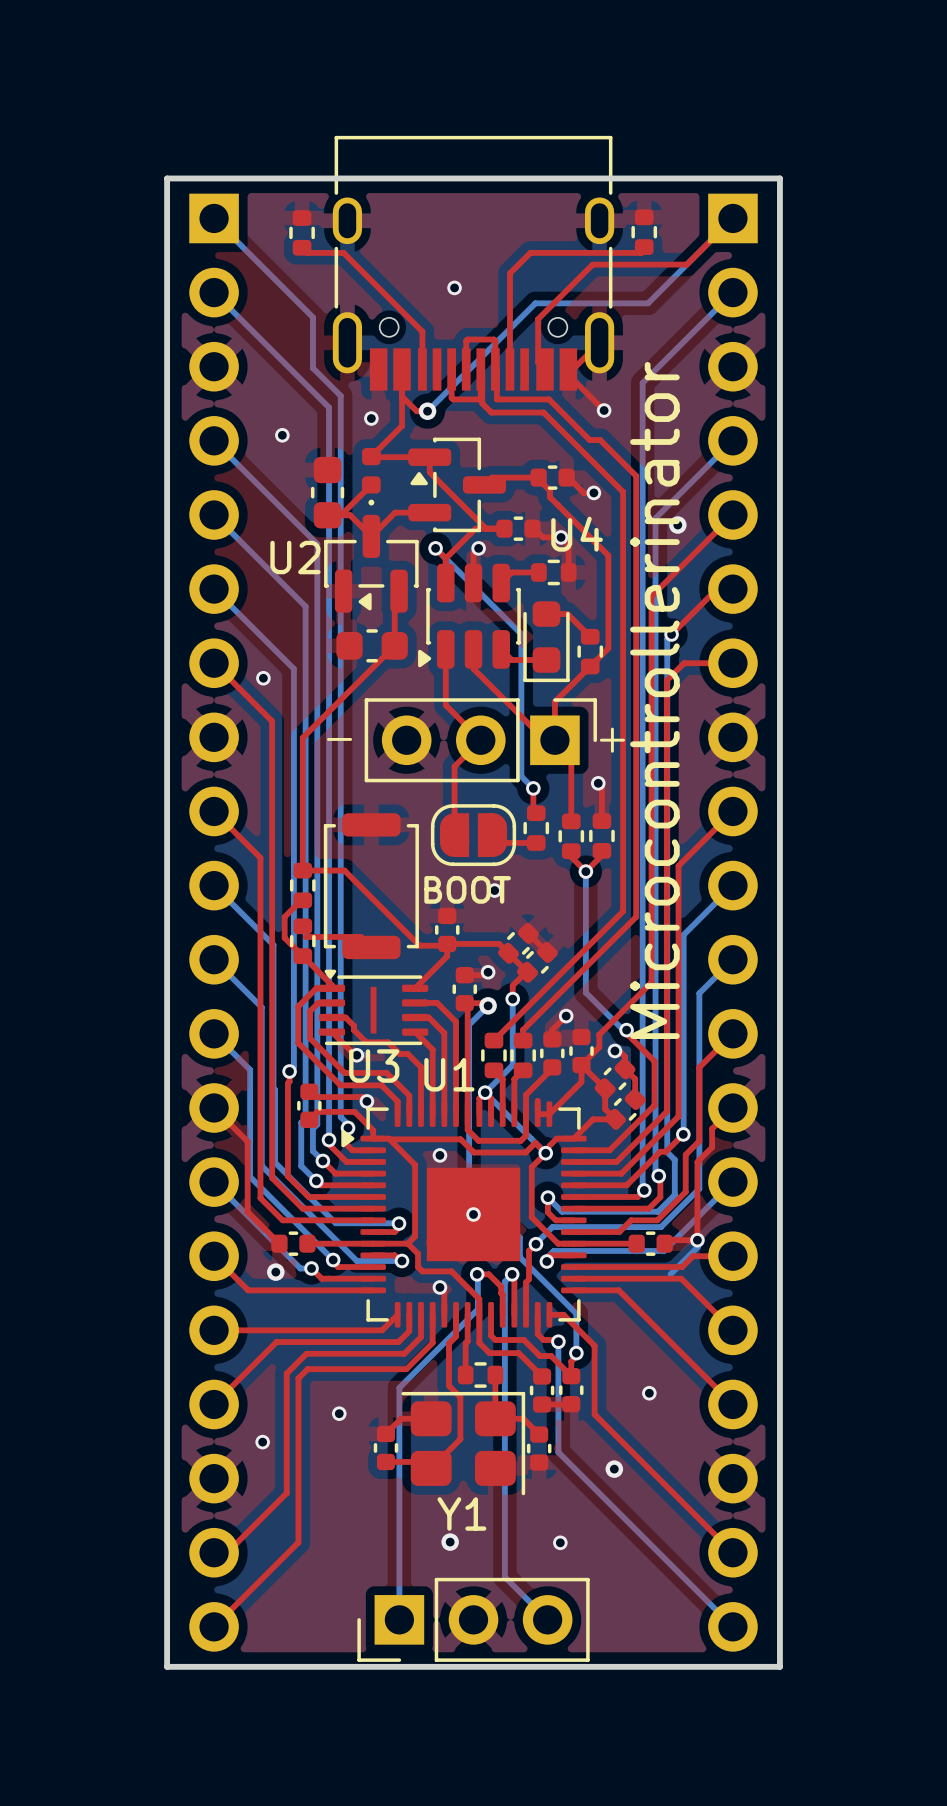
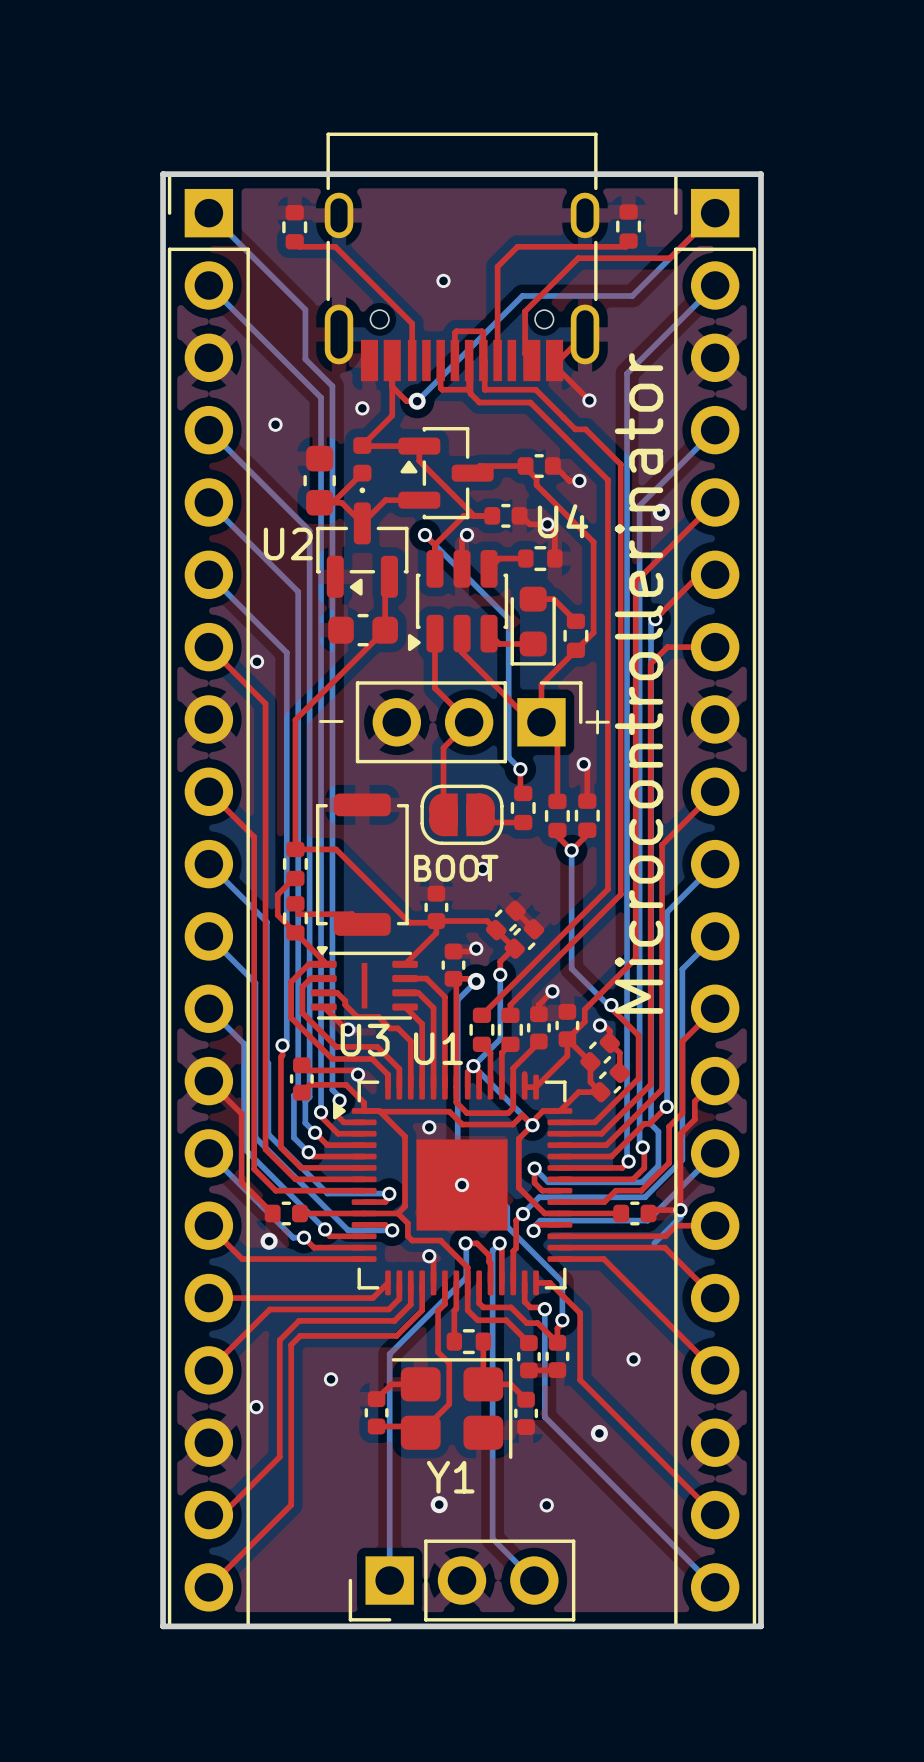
part side: bottom (214, 922) -> top (208, 900)
part side: bottom (732, 922) -> top (715, 900)

